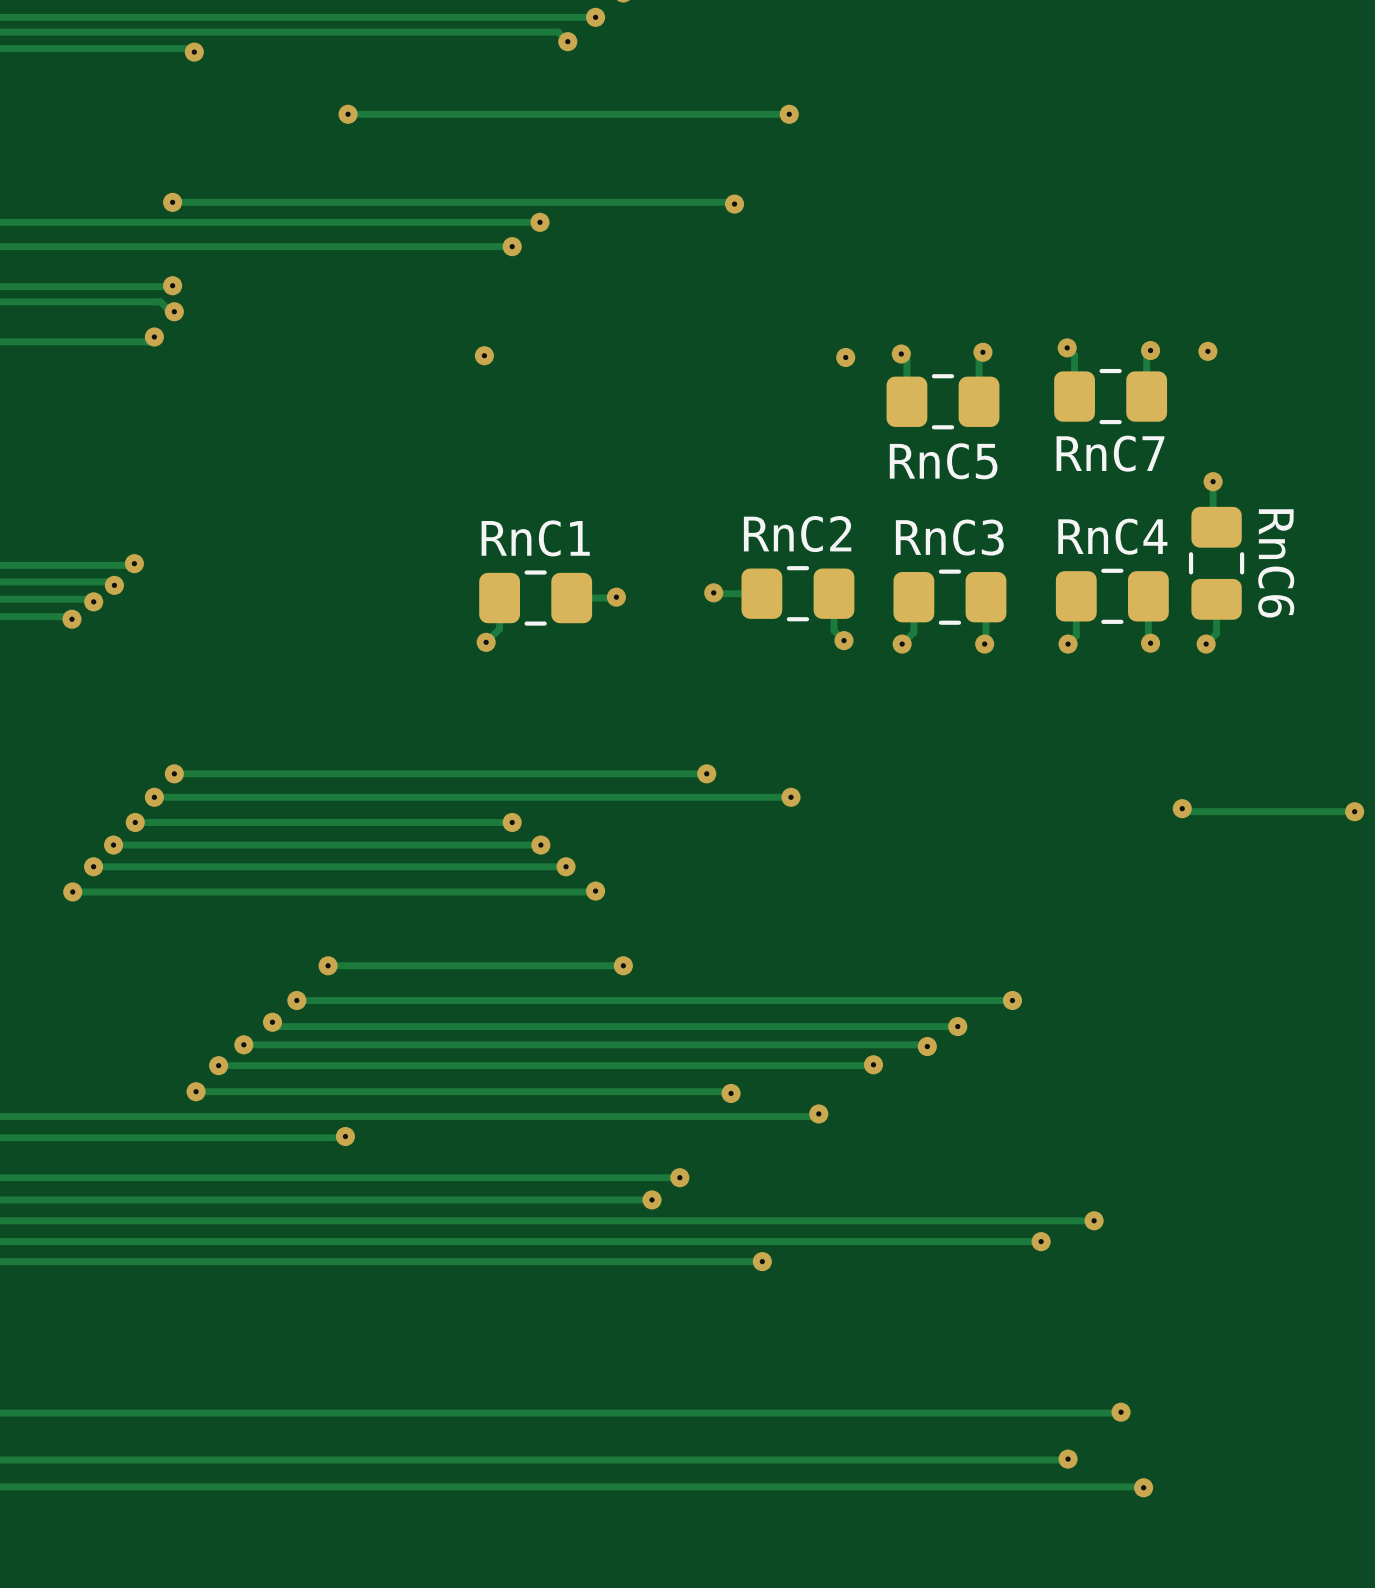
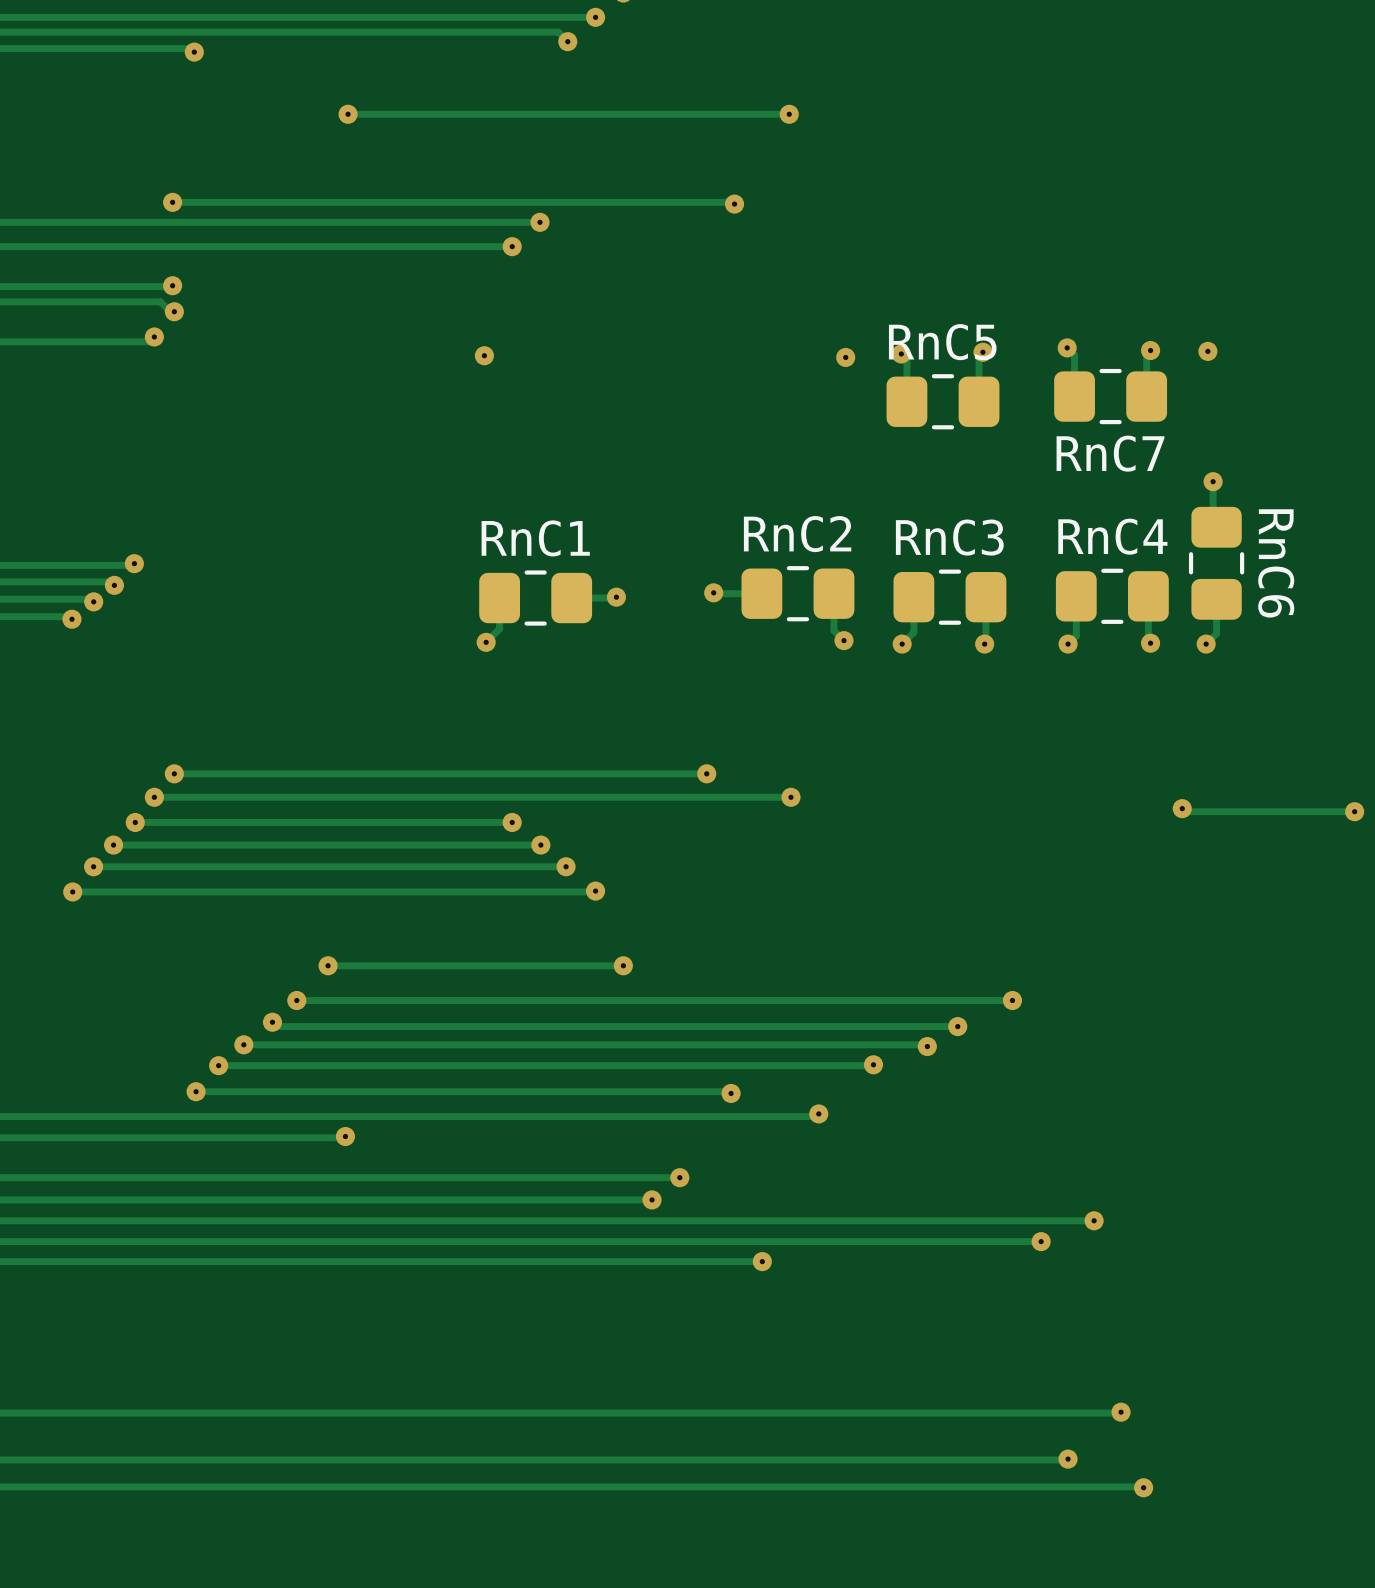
RnC5 name position: RnC5 (943, 461) -> RnC5 (942, 342)

